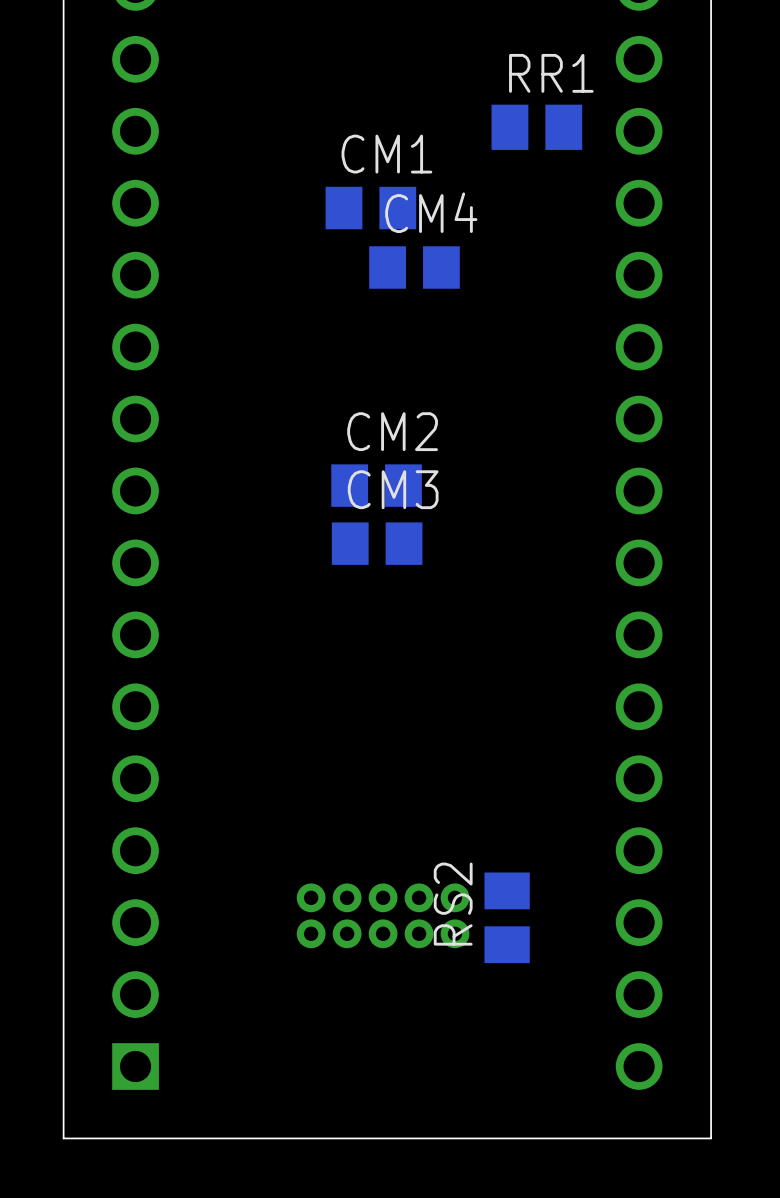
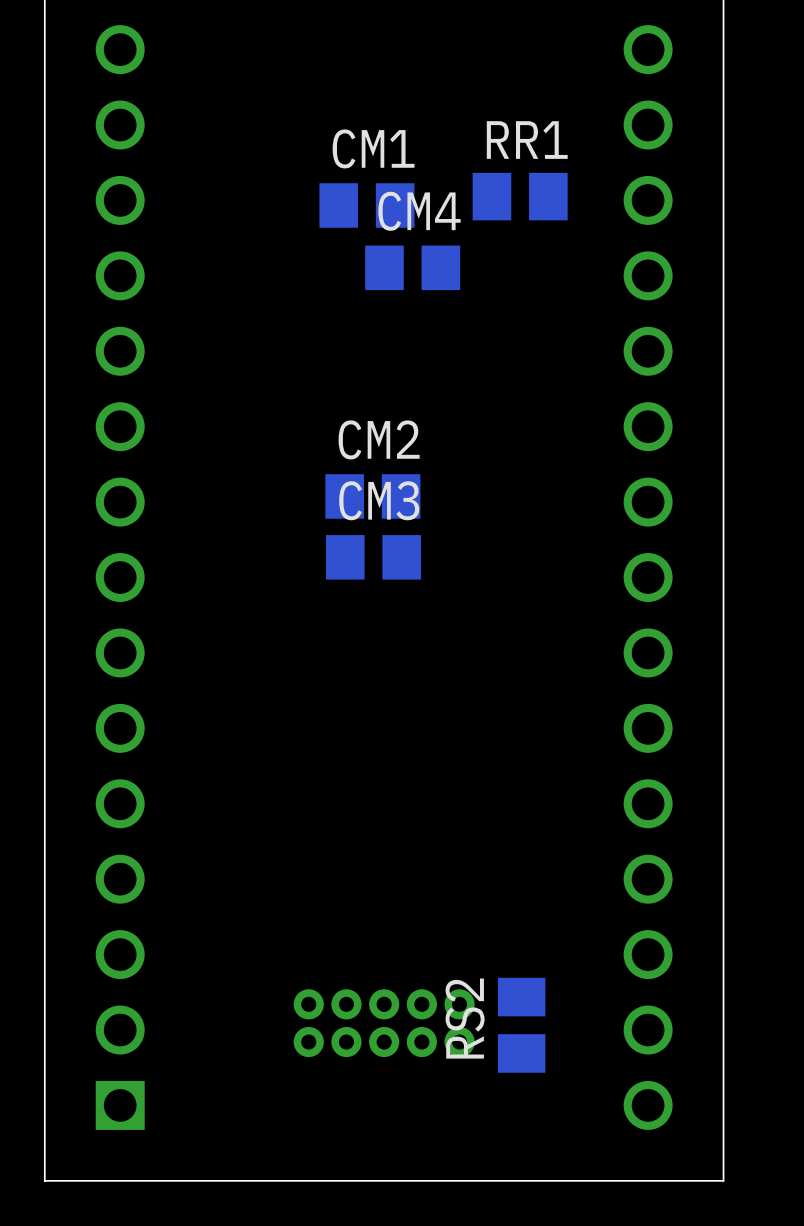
RR1 position: (536, 127) -> (520, 196)
part position: (383, 915) -> (384, 1023)
RS2 position: (507, 917) -> (521, 1025)

